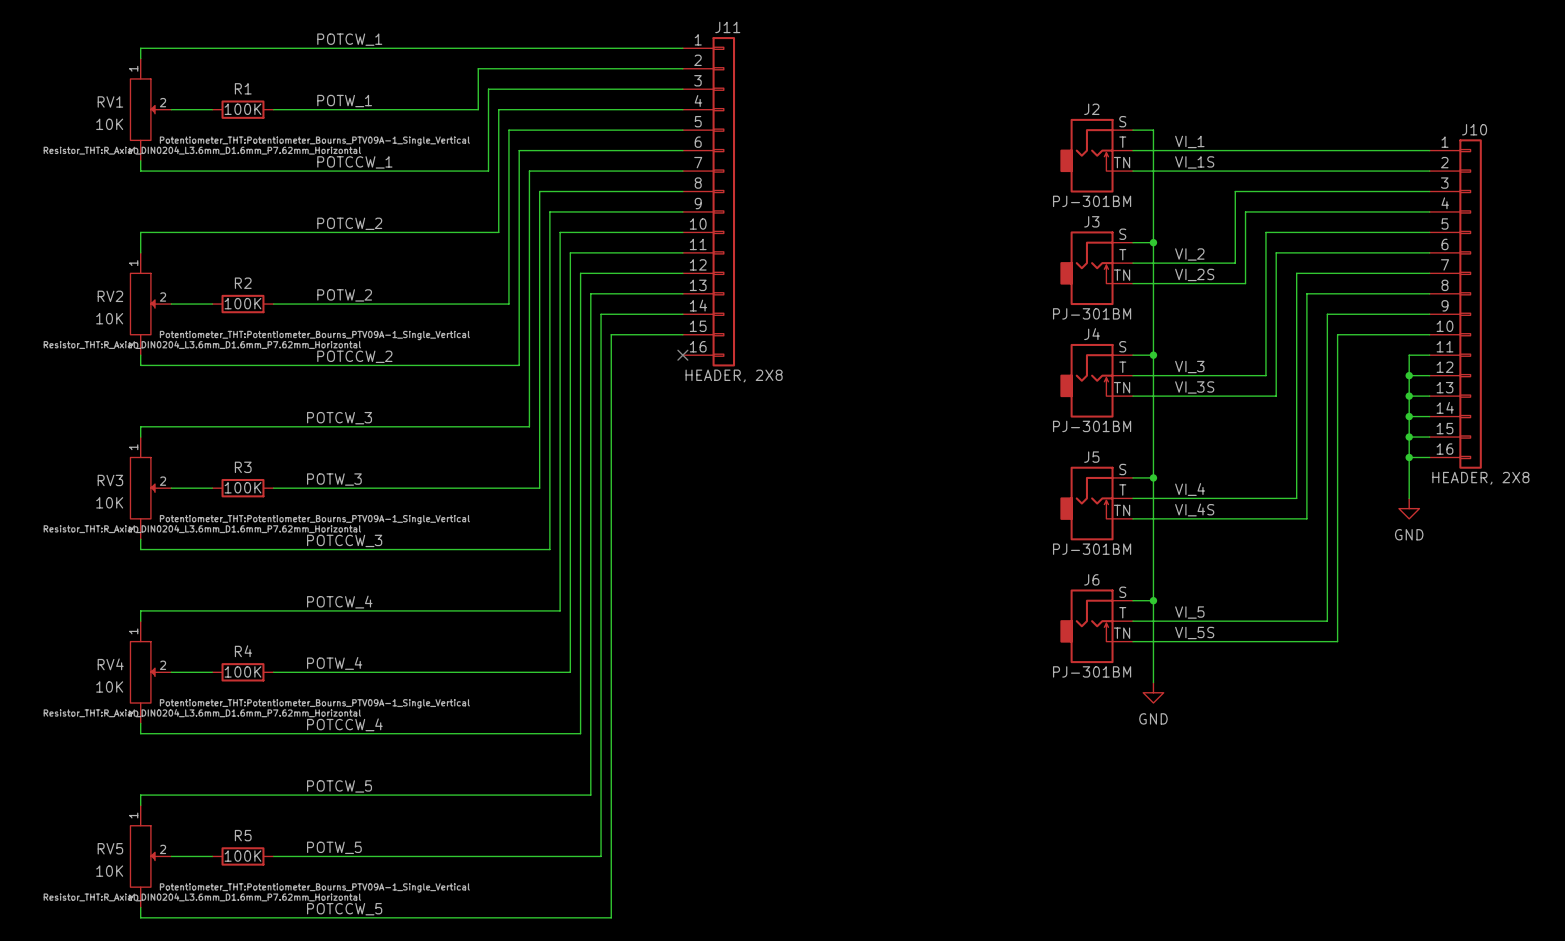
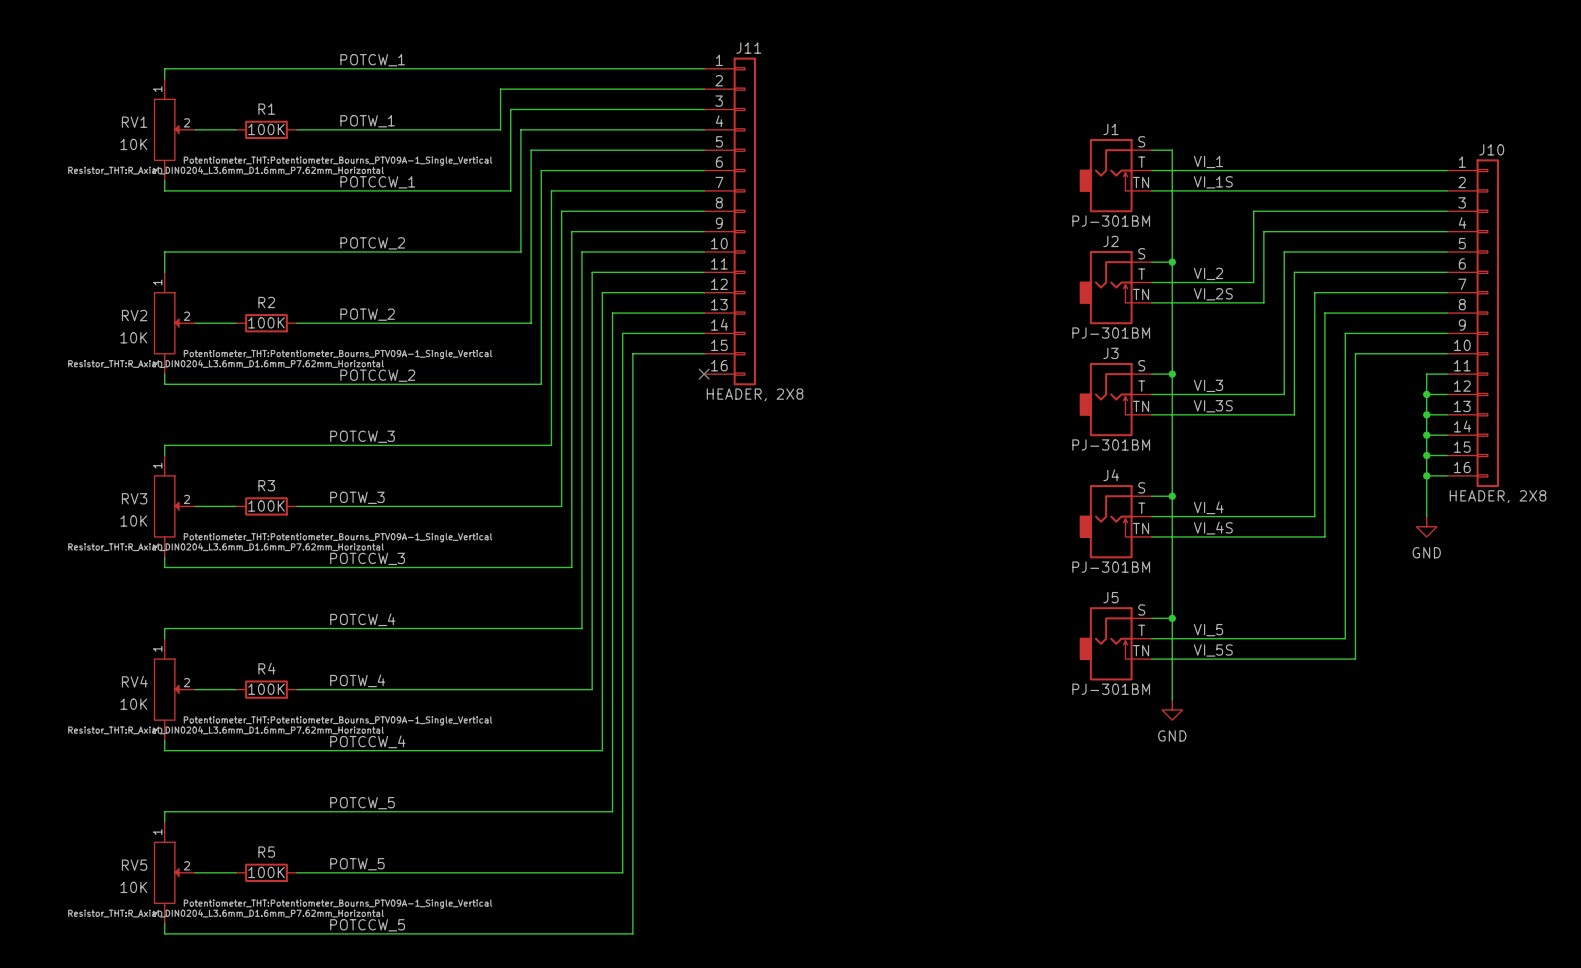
J2 name: J2 (1091, 109) -> J1 (1110, 129)
J3 name: J3 (1091, 221) -> J2 (1110, 241)
J4 name: J4 (1092, 334) -> J3 (1110, 353)
J5 name: J5 (1091, 457) -> J4 (1111, 475)
J6 name: J6 (1091, 579) -> J5 (1110, 597)

